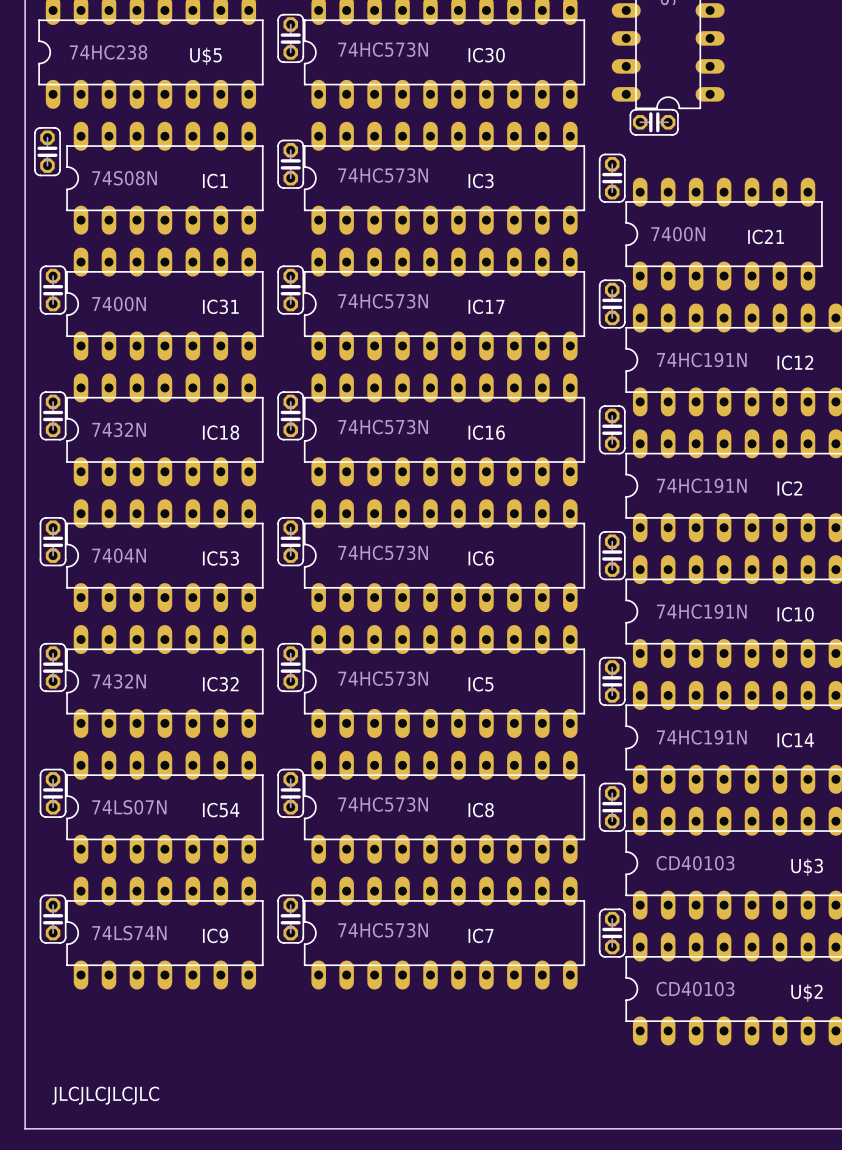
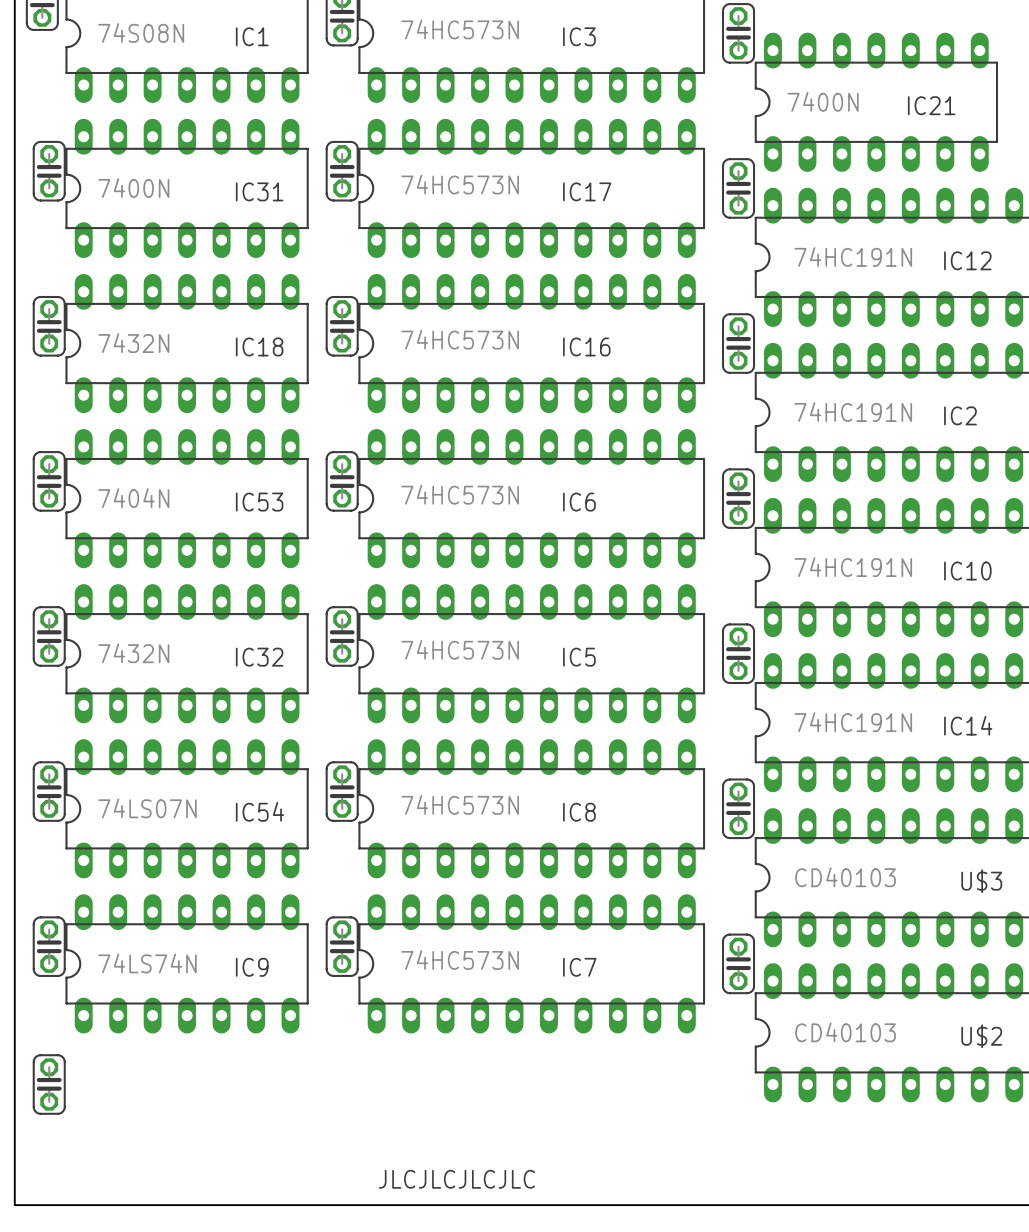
part: none -> (49, 1084)
text position: JLCJLCJLCJLC (105, 1095) -> JLCJLCJLCJLC (456, 1179)

